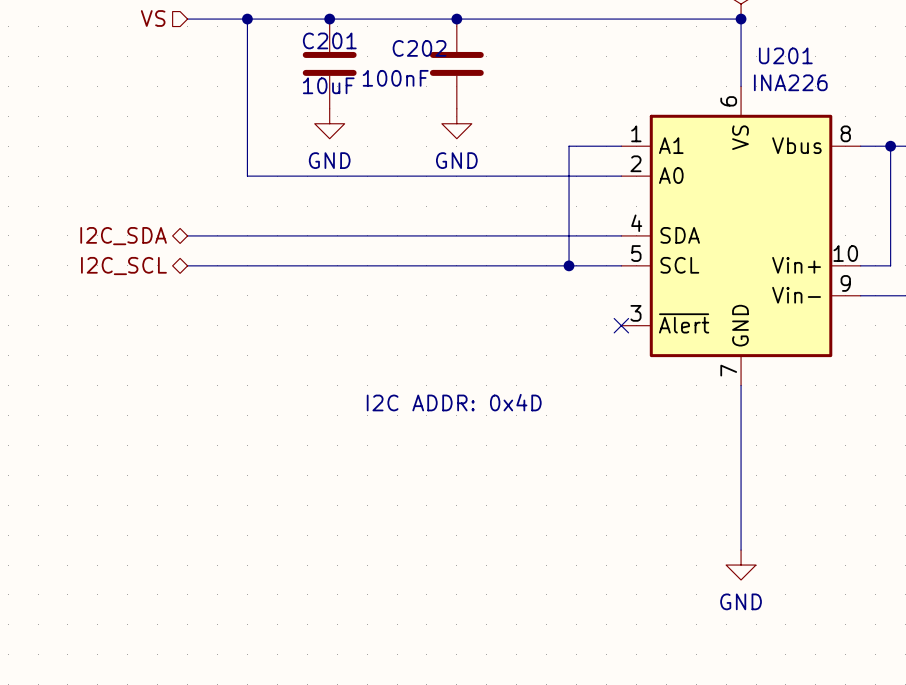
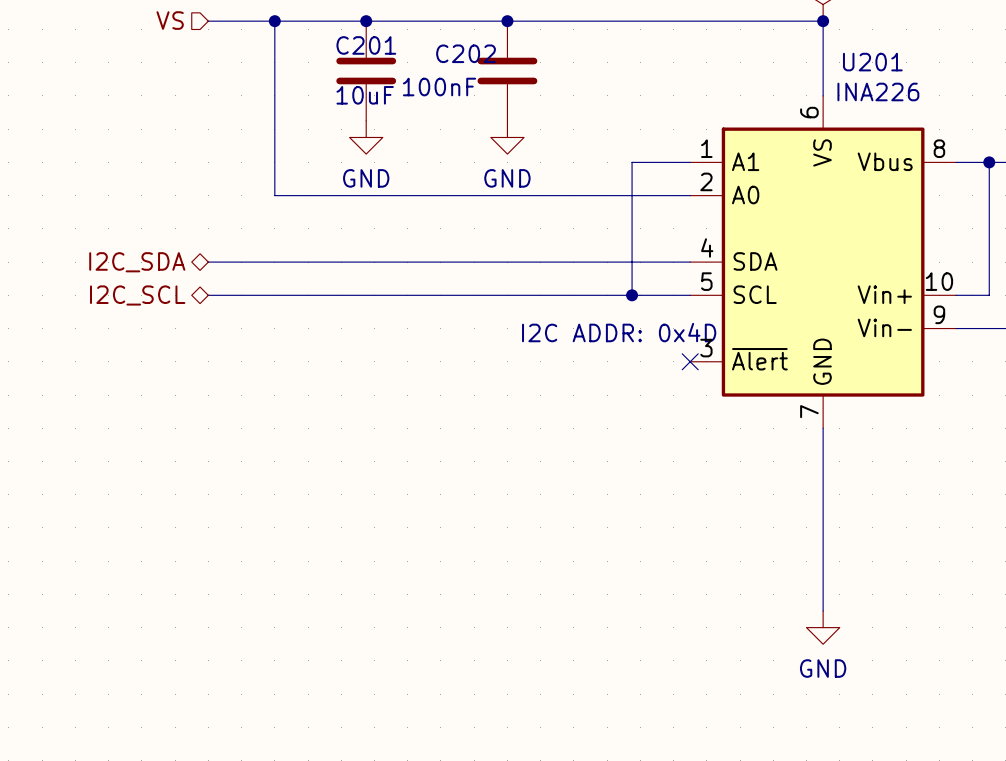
text position: I2C ADDR: 0x4D (454, 402) -> I2C ADDR: 0x4D (619, 332)

